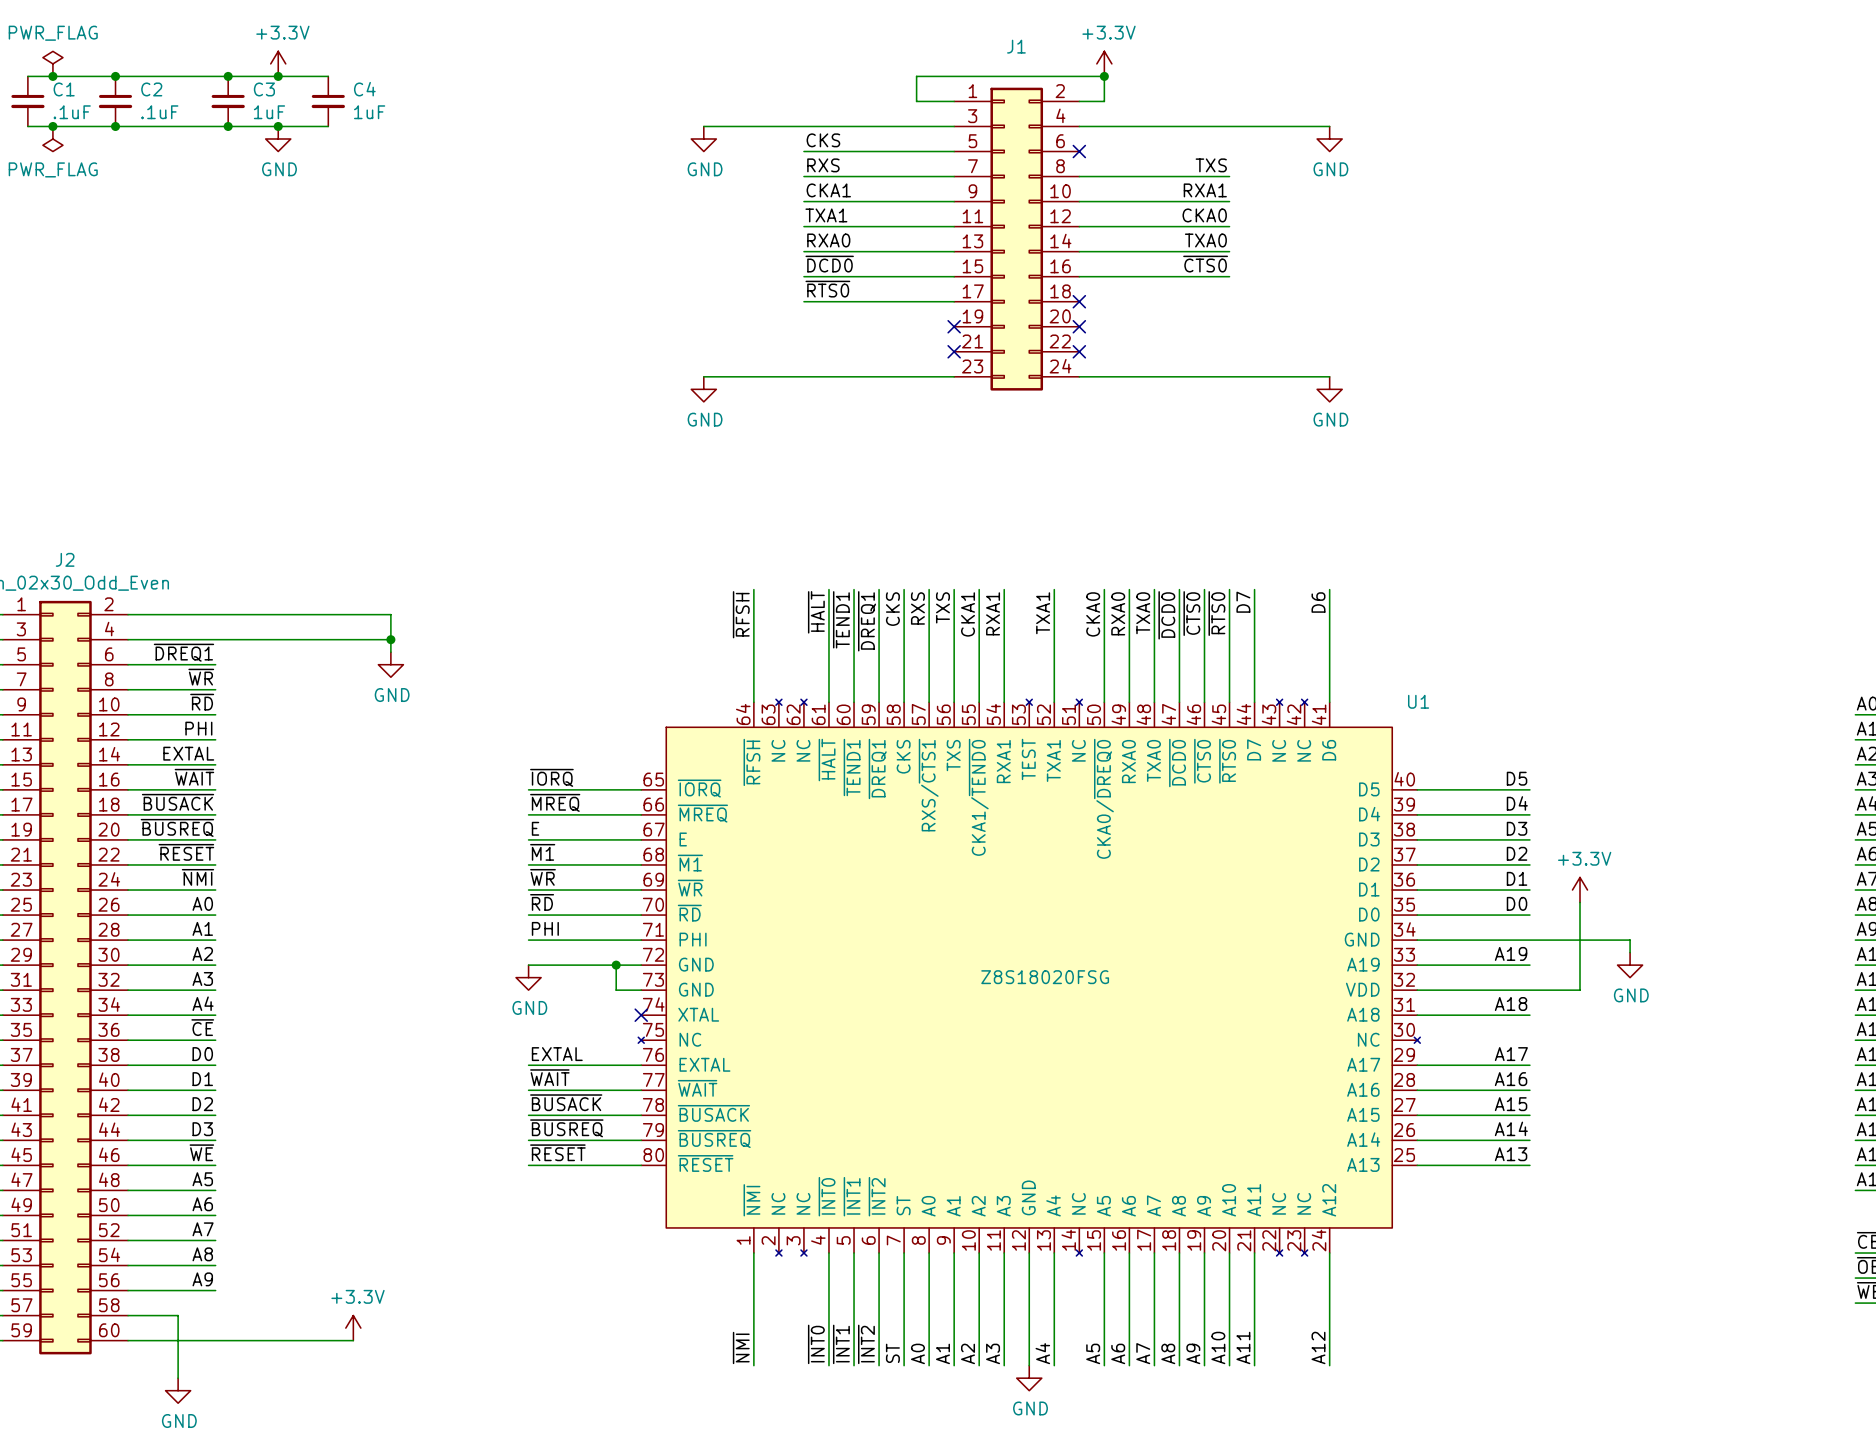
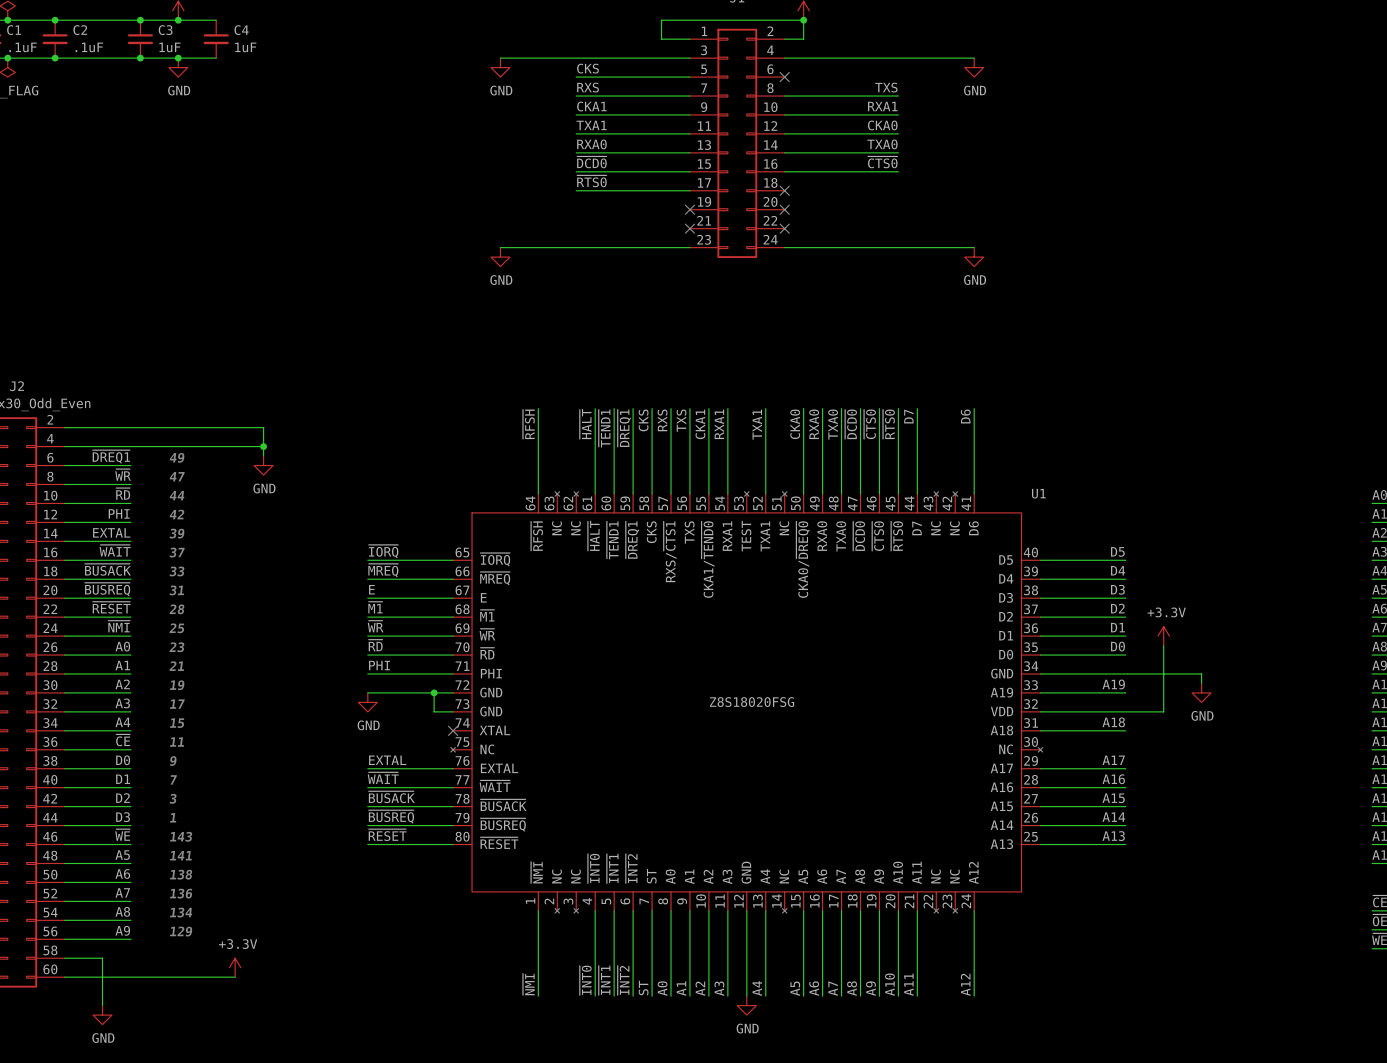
text: none -> 49 (177, 457)
text: none -> 47 (177, 476)
text: none -> 44 (177, 495)
text: none -> 42 (177, 514)
text: none -> 39 (177, 533)
text: none -> 37 (177, 552)
text: none -> 33 (177, 571)
text: none -> 31 (176, 590)
text: none -> 28 (177, 609)
text: none -> 25 (176, 628)
text: none -> 23 (177, 647)
text: none -> 21 (176, 666)
text: none -> 19 (177, 685)
text: none -> 17 (177, 704)
text: none -> 15 (177, 723)
text: none -> 11 (177, 742)
text: none -> 9 (173, 761)
text: none -> 7 (173, 779)
text: none -> 3 (173, 798)
text: none -> 1 (173, 817)
text: none -> 143 (181, 836)
text: none -> 141 (180, 855)
text: none -> 138 (181, 874)
text: none -> 136 (181, 893)
text: none -> 134 (181, 912)
text: none -> 129 (181, 931)

